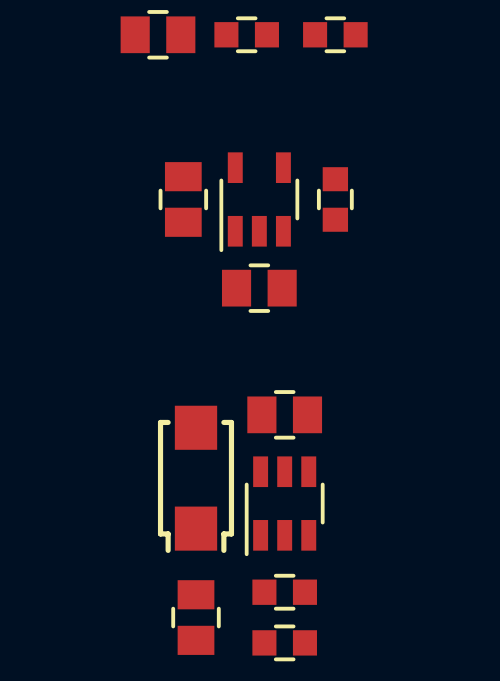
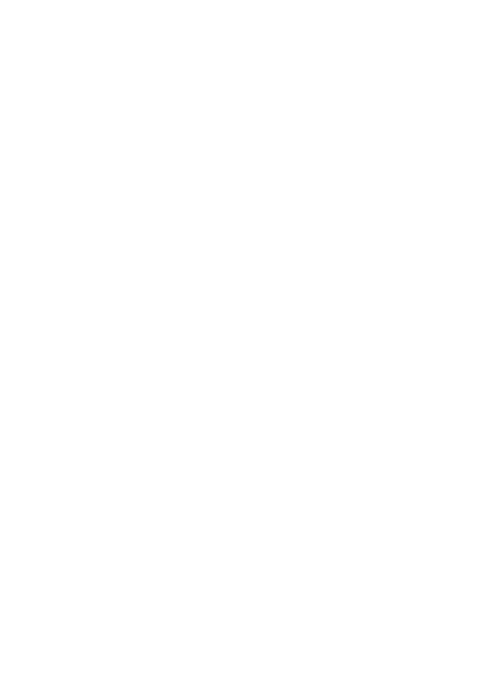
part: (157, 34) -> none
part: (246, 34) -> none
part: (335, 34) -> none
part: (183, 199) -> none
part: (335, 199) -> none
part: (259, 202) -> none
part: (259, 288) -> none
part: (284, 414) -> none
part: (196, 479) -> none
part: (284, 506) -> none
part: (284, 592) -> none
part: (196, 617) -> none
part: (284, 642) -> none

